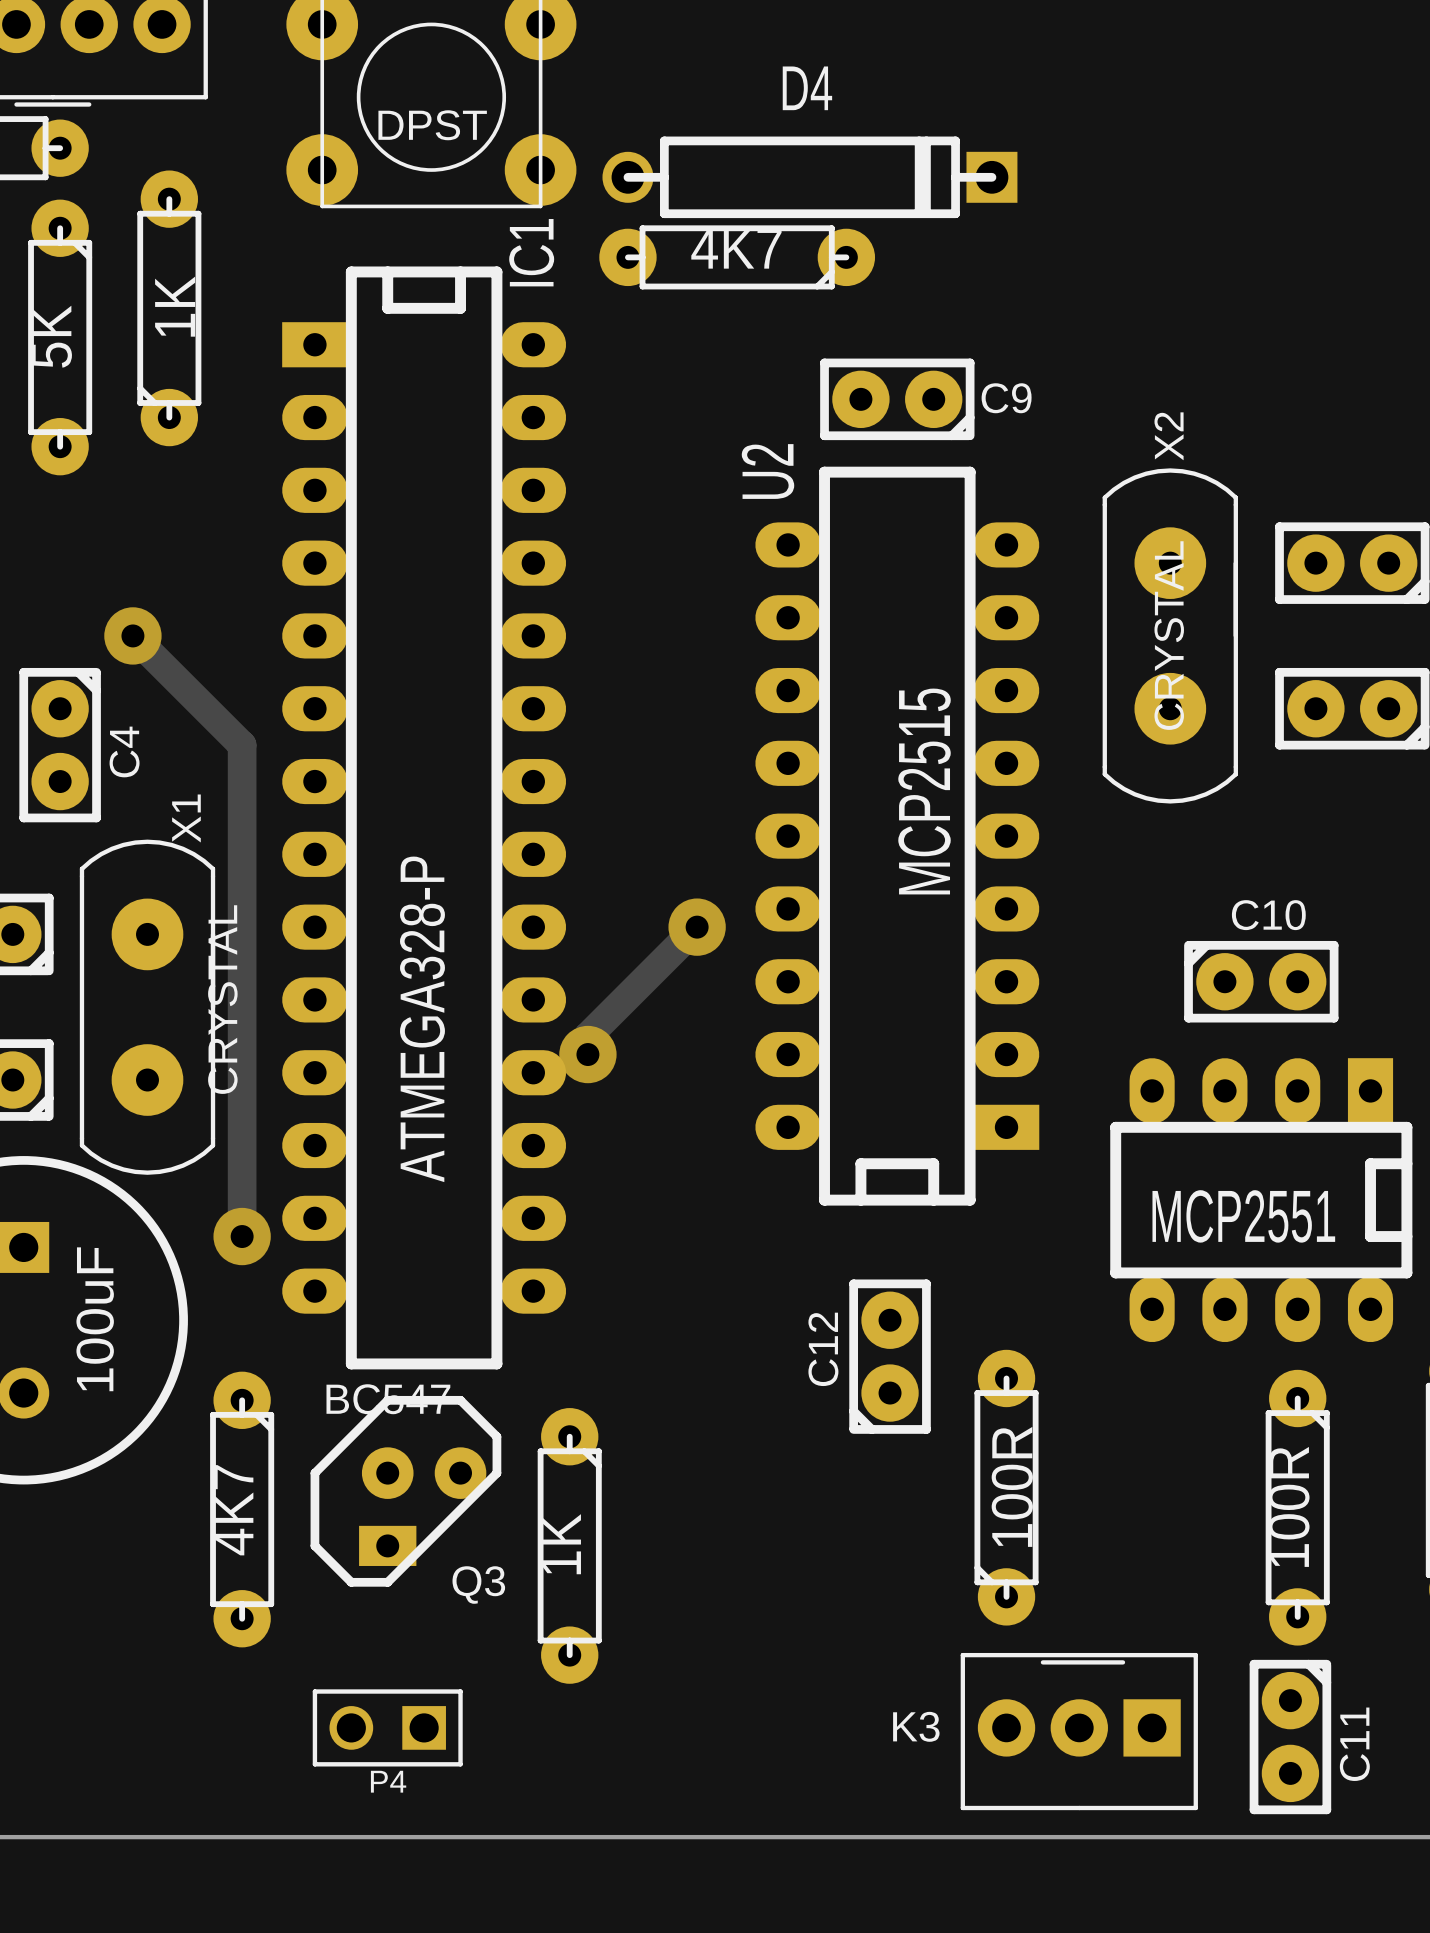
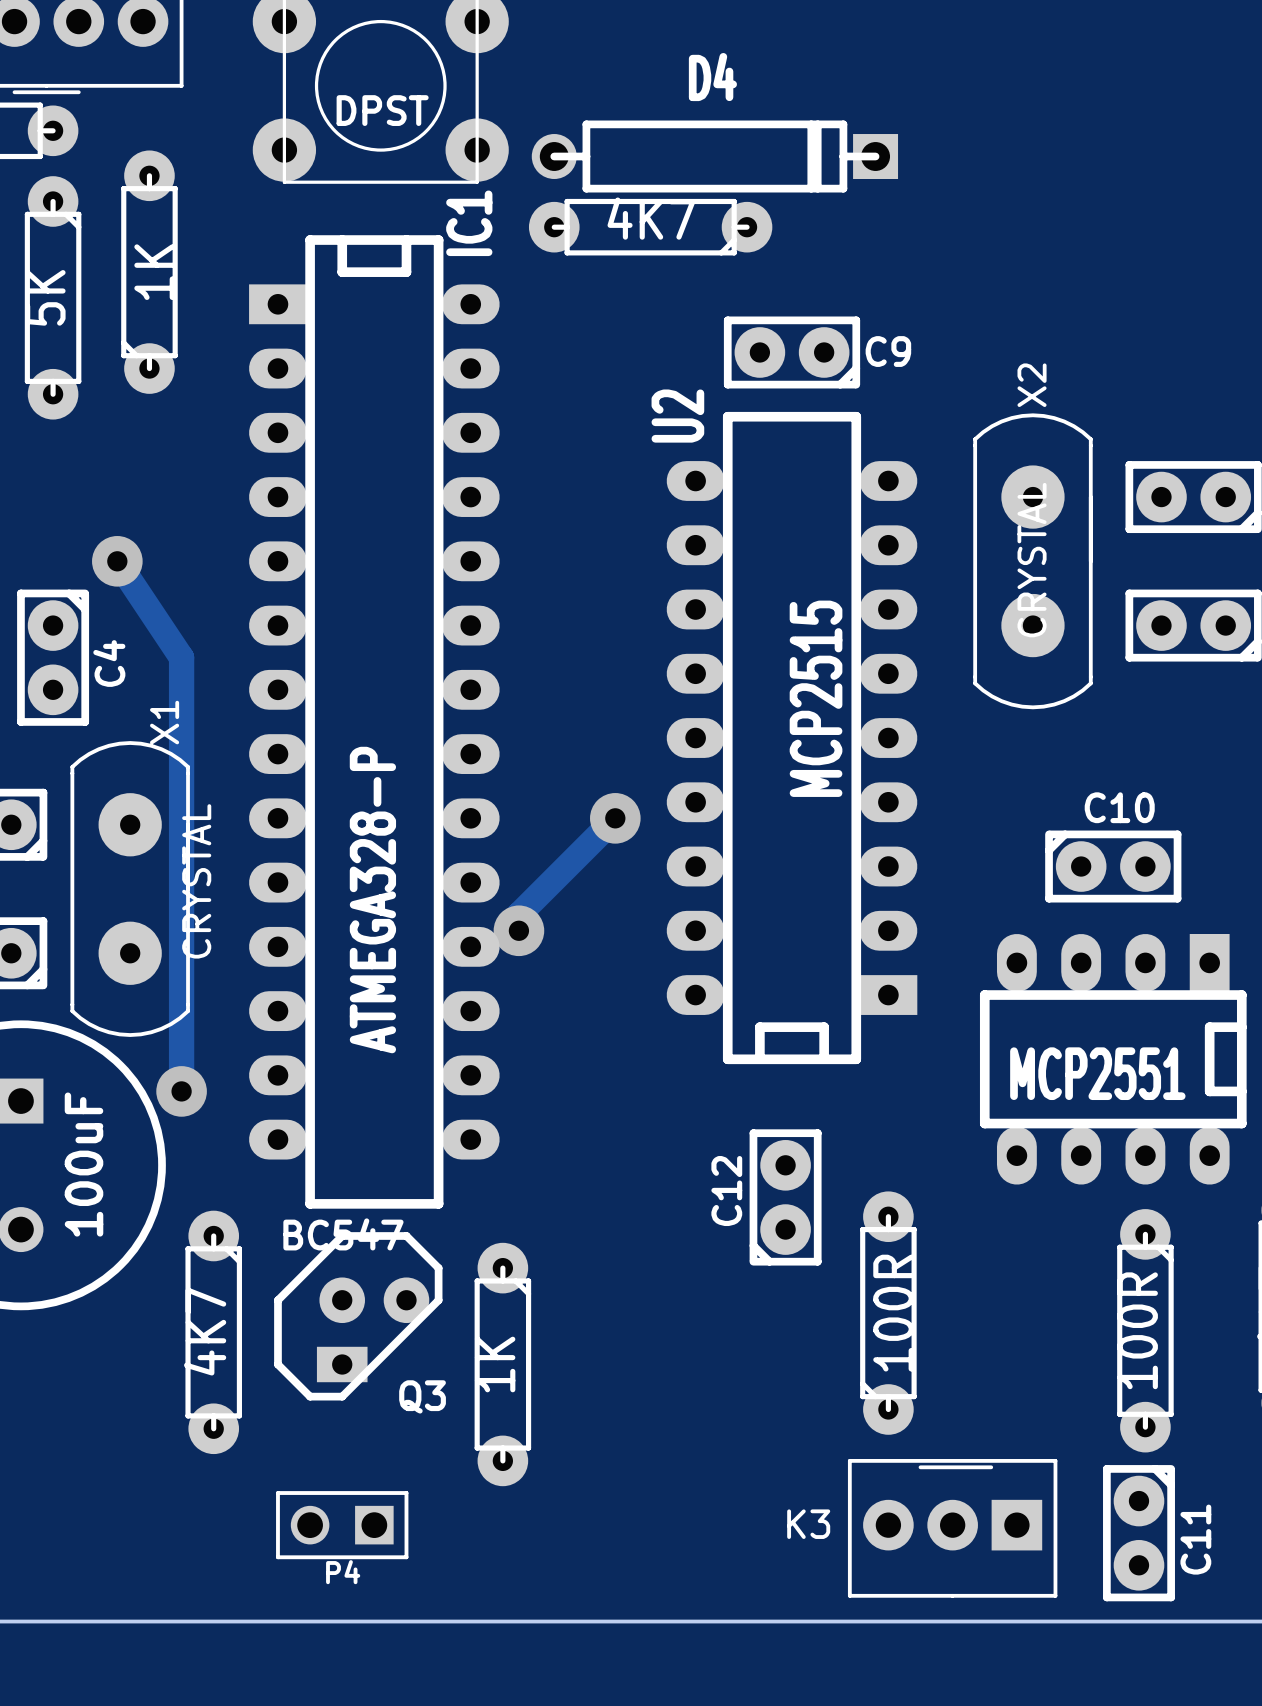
track: (132, 635) (242, 745) (242, 1236) -> (117, 561) (181, 657) (181, 1091)
via position: (242, 1236) -> (181, 1091)

